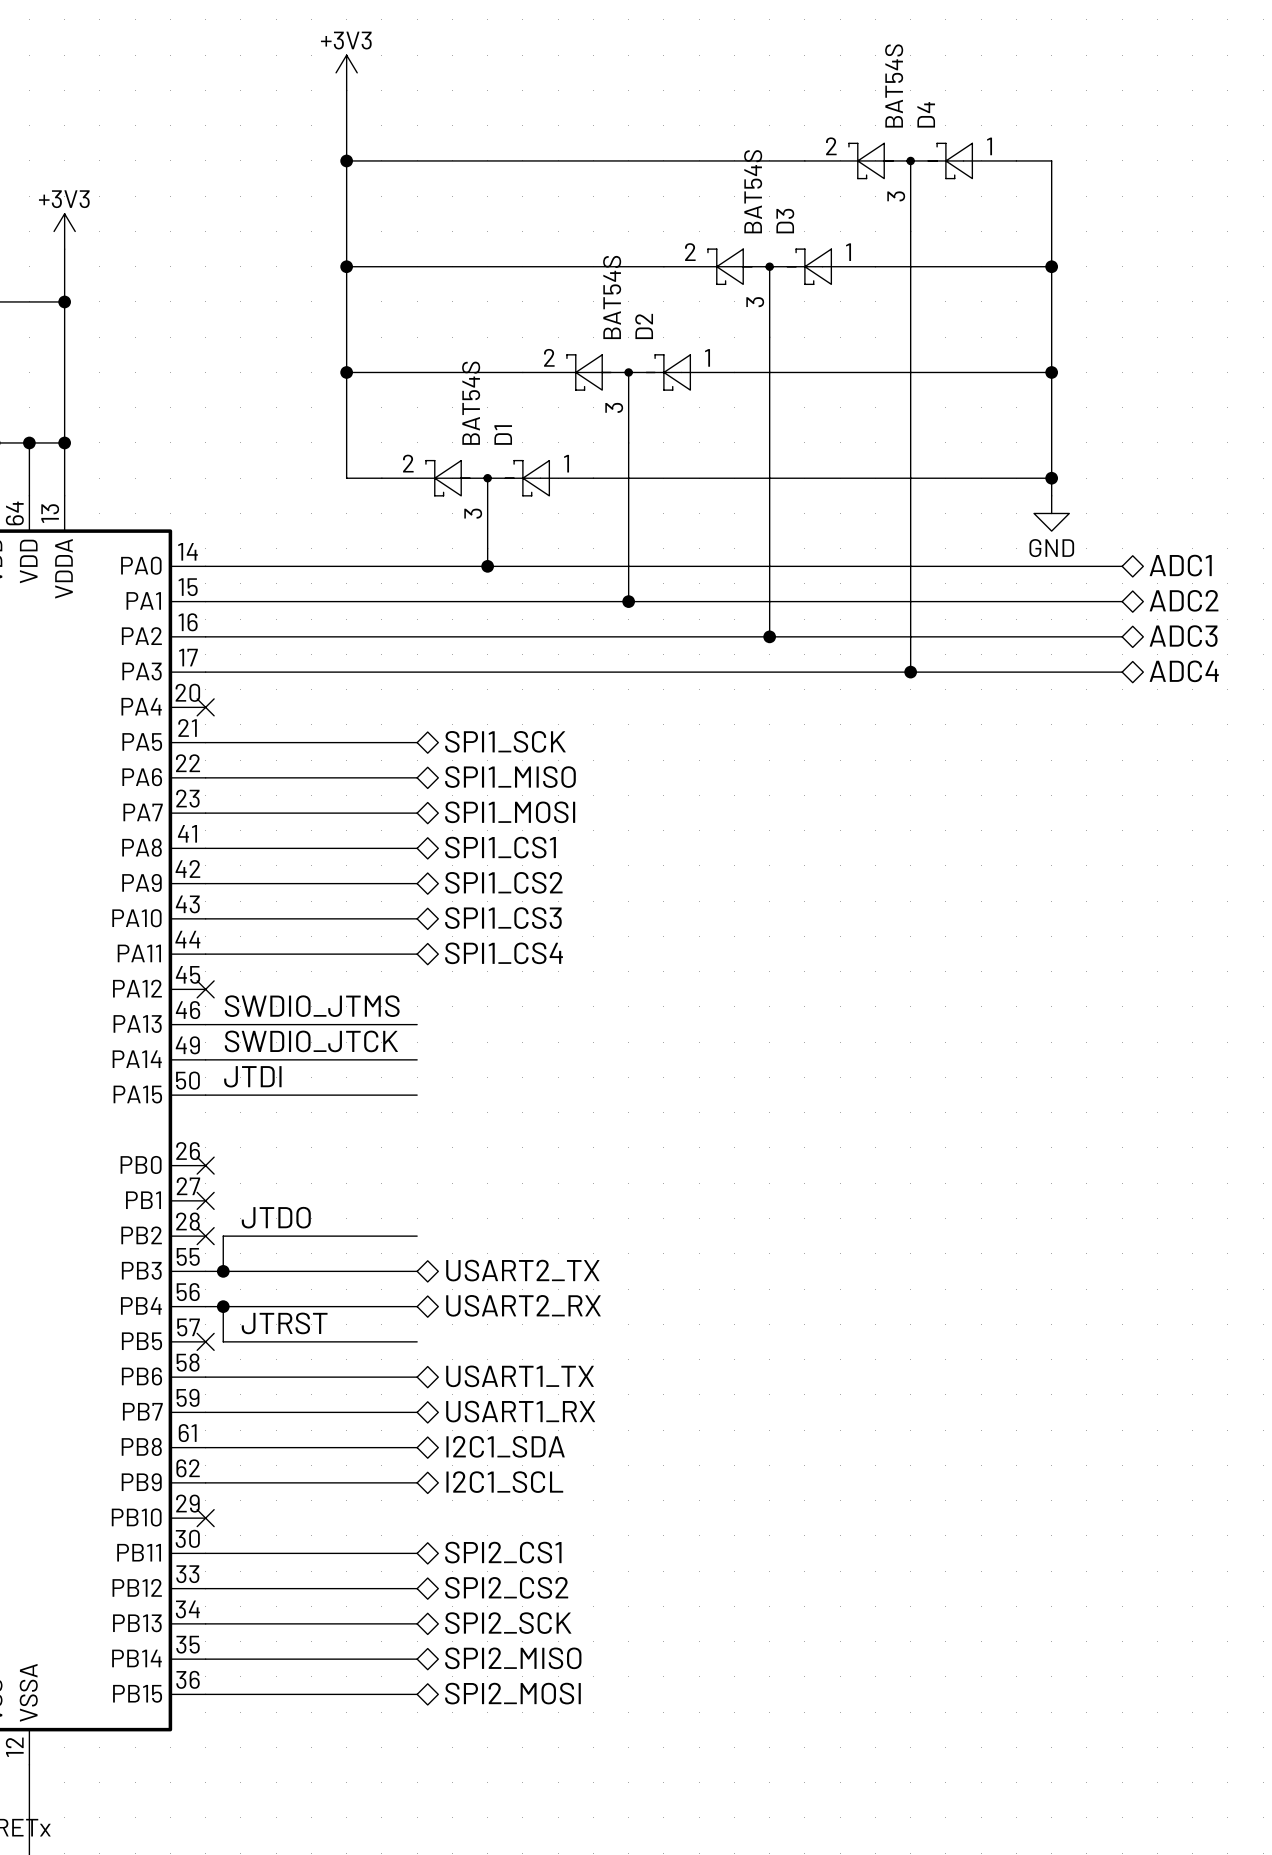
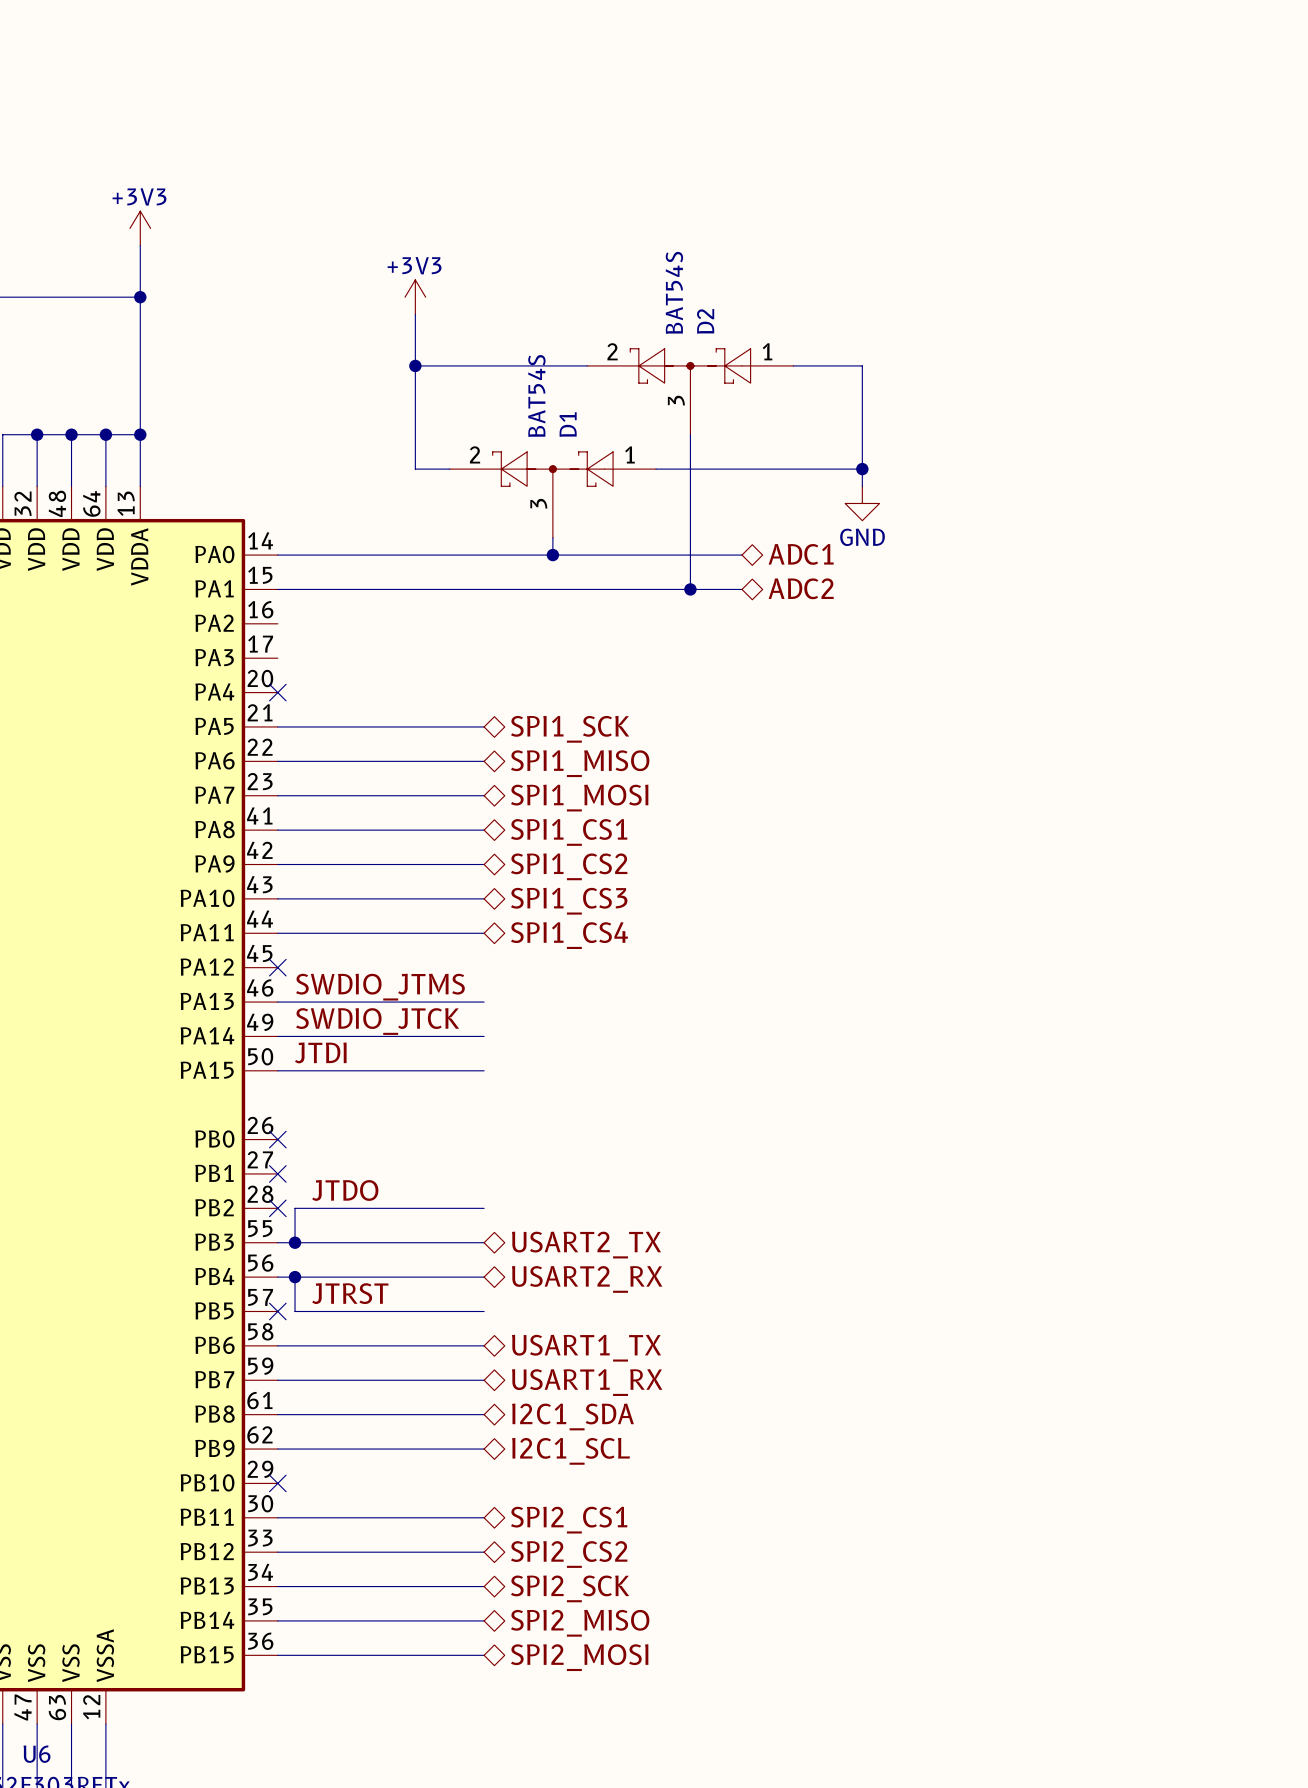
power symbol position: +3V3 (346, 72) -> +3V3 (415, 297)
wire: (346, 90) (346, 319) -> none
wire: (346, 160) (804, 160) -> none
junction: (346, 160) -> none
wire: (1016, 160) (1051, 160) (1051, 495) -> none
D4: BAT54S (910, 187) -> none
wire: (910, 231) (910, 672) -> none
wire: (346, 266) (663, 266) -> none
junction: (346, 266) -> none
wire: (875, 266) (1051, 266) -> none
junction: (1051, 266) -> none
D3: BAT54S (769, 293) -> none
wire: (769, 337) (769, 636) -> none
wire: (804, 372) (1051, 372) -> (862, 365) (862, 486)
junction: (1051, 372) -> none
wire: (804, 478) (1051, 478) -> none
junction: none -> (862, 469)
junction: (1051, 478) -> none
power symbol position: GND (1051, 513) -> GND (862, 503)
hierarchical label: none -> ADC1 (801, 554)
hierarchical label: ADC1 (1180, 565) -> none
wire: (681, 566) (1122, 566) -> none
hierarchical label: none -> ADC2 (801, 588)
hierarchical label: ADC2 (1184, 600) -> none
wire: (681, 601) (1122, 601) -> none
wire: (205, 636) (1122, 636) -> none
junction: (769, 636) -> none
hierarchical label: ADC3 (1183, 636) -> none
hierarchical label: ADC4 (1184, 671) -> none
wire: (205, 672) (1122, 672) -> none
junction: (910, 672) -> none

